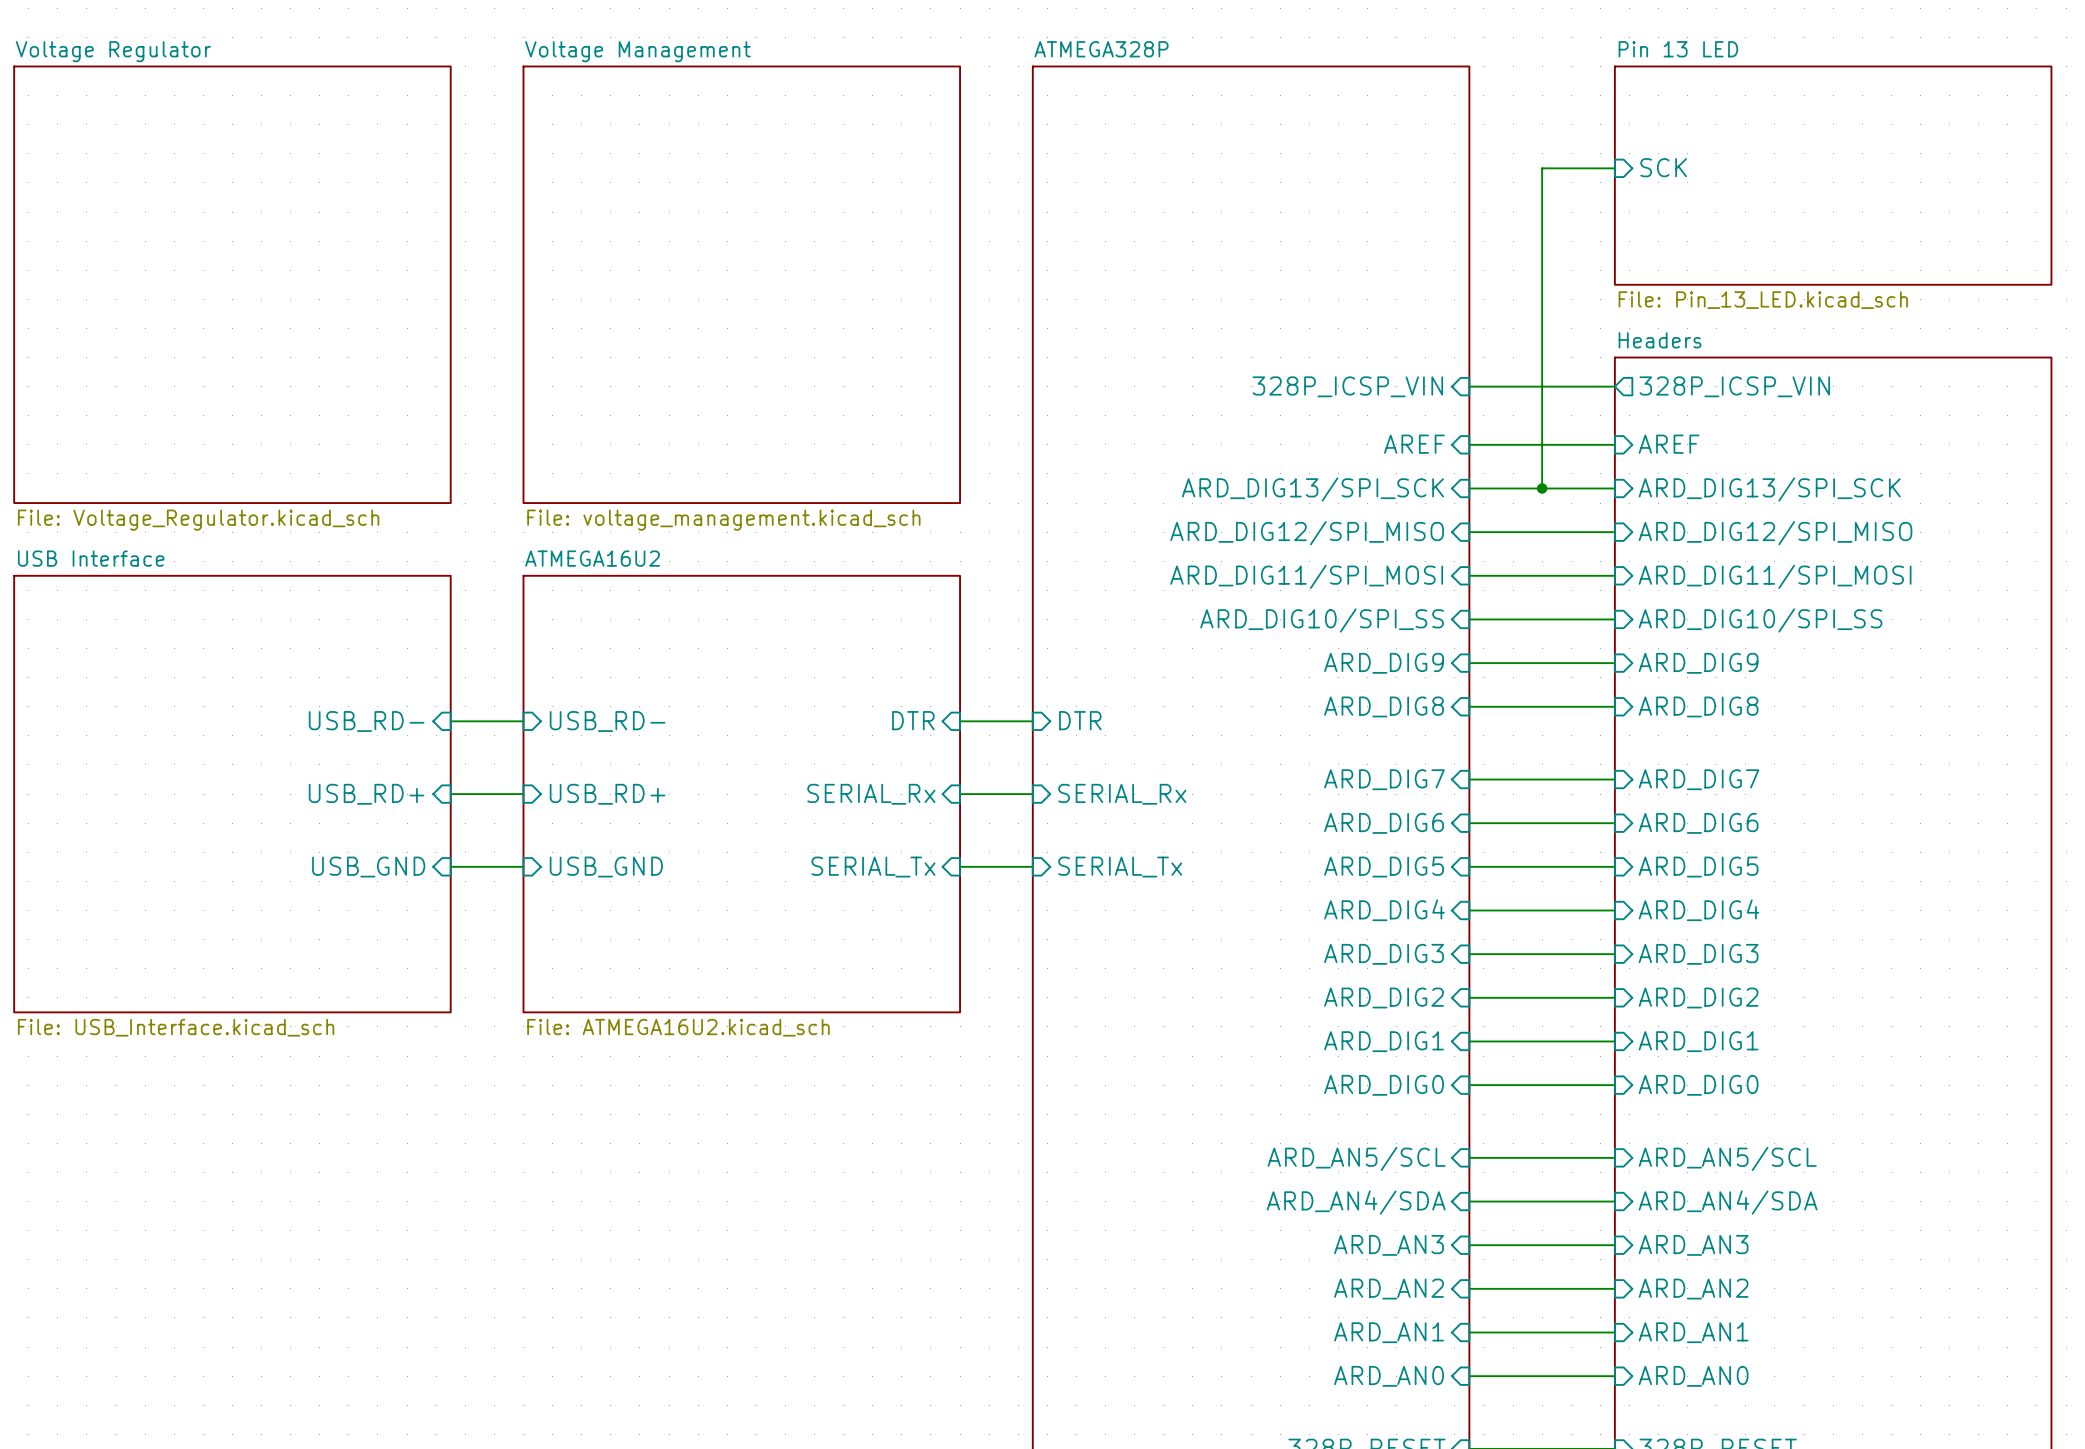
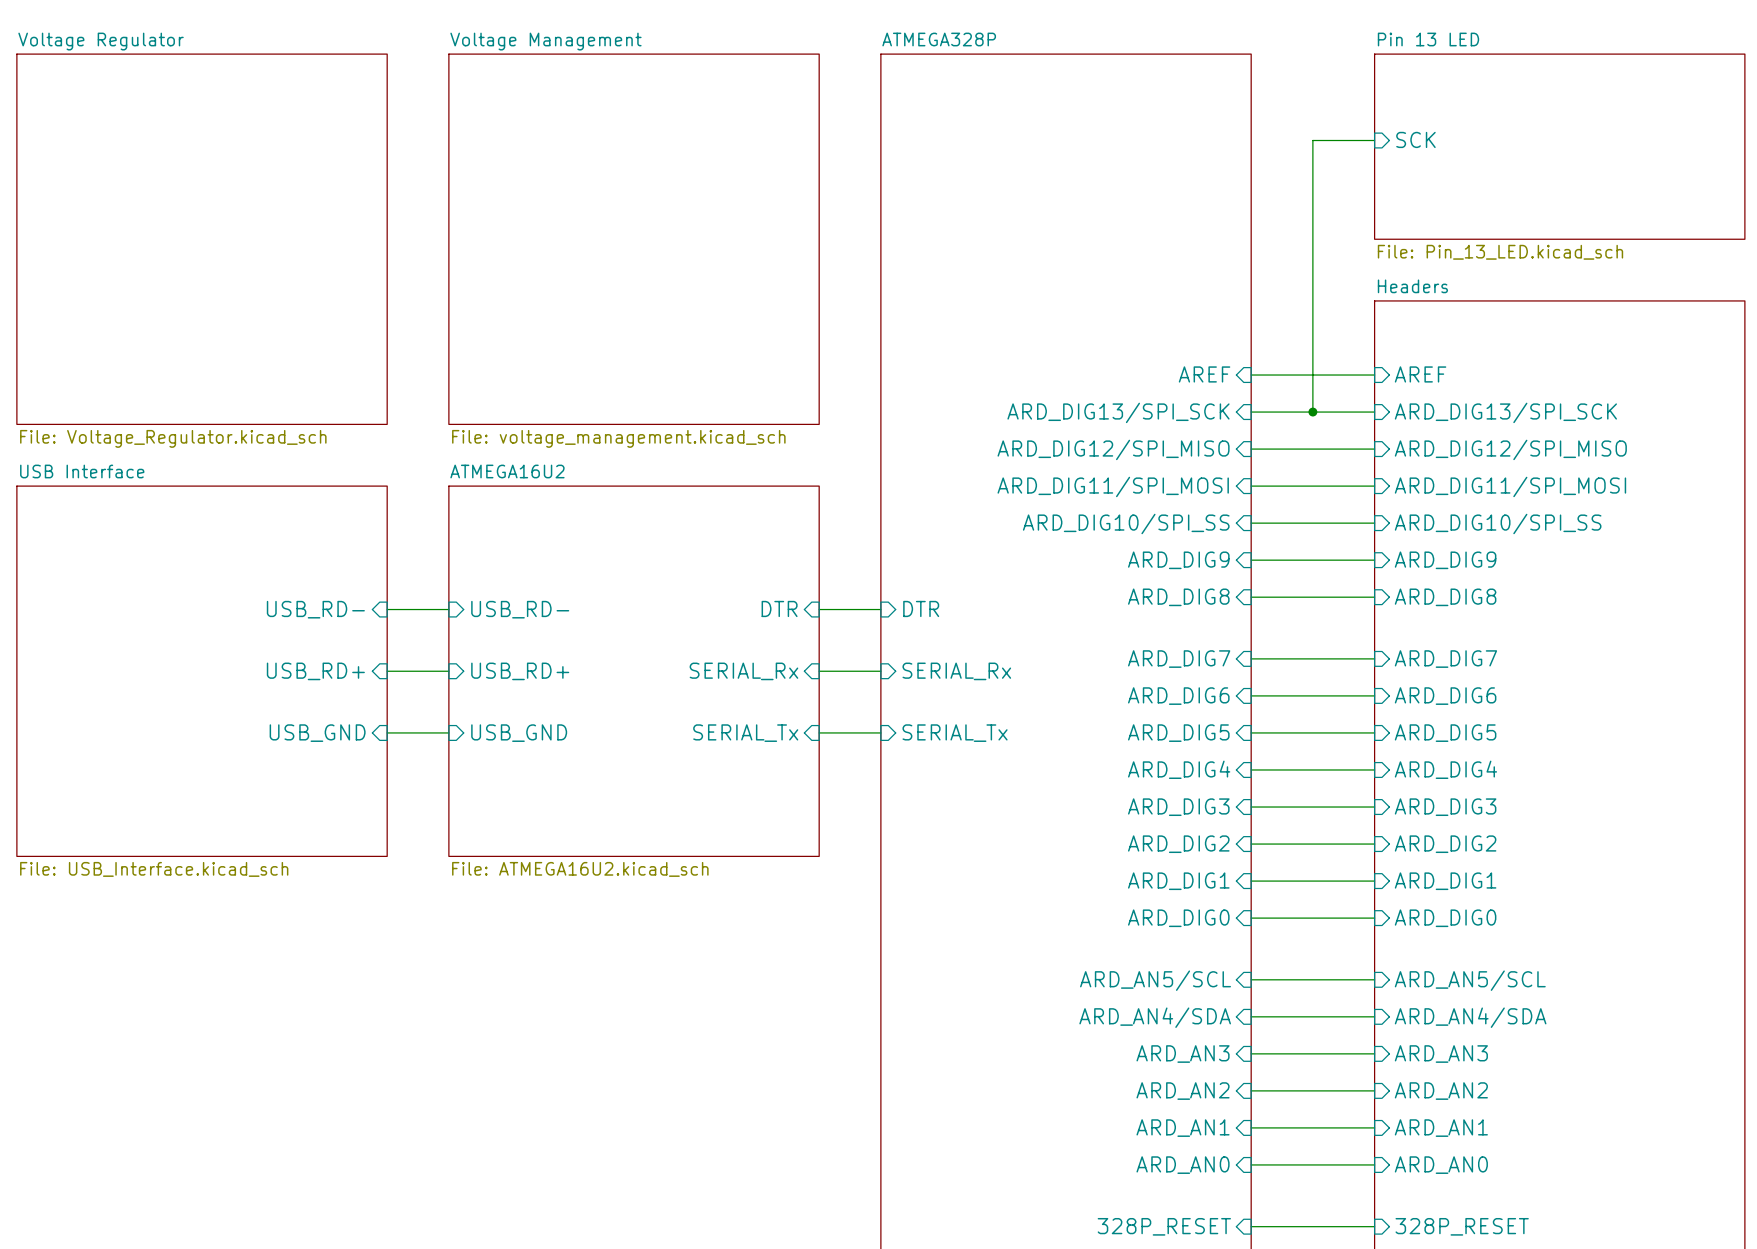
sheet pin: 328P_ICSP_VIN (1347, 386) -> none
wire: (1469, 386) (1614, 386) -> none
sheet pin: 328P_ICSP_VIN (1734, 386) -> none

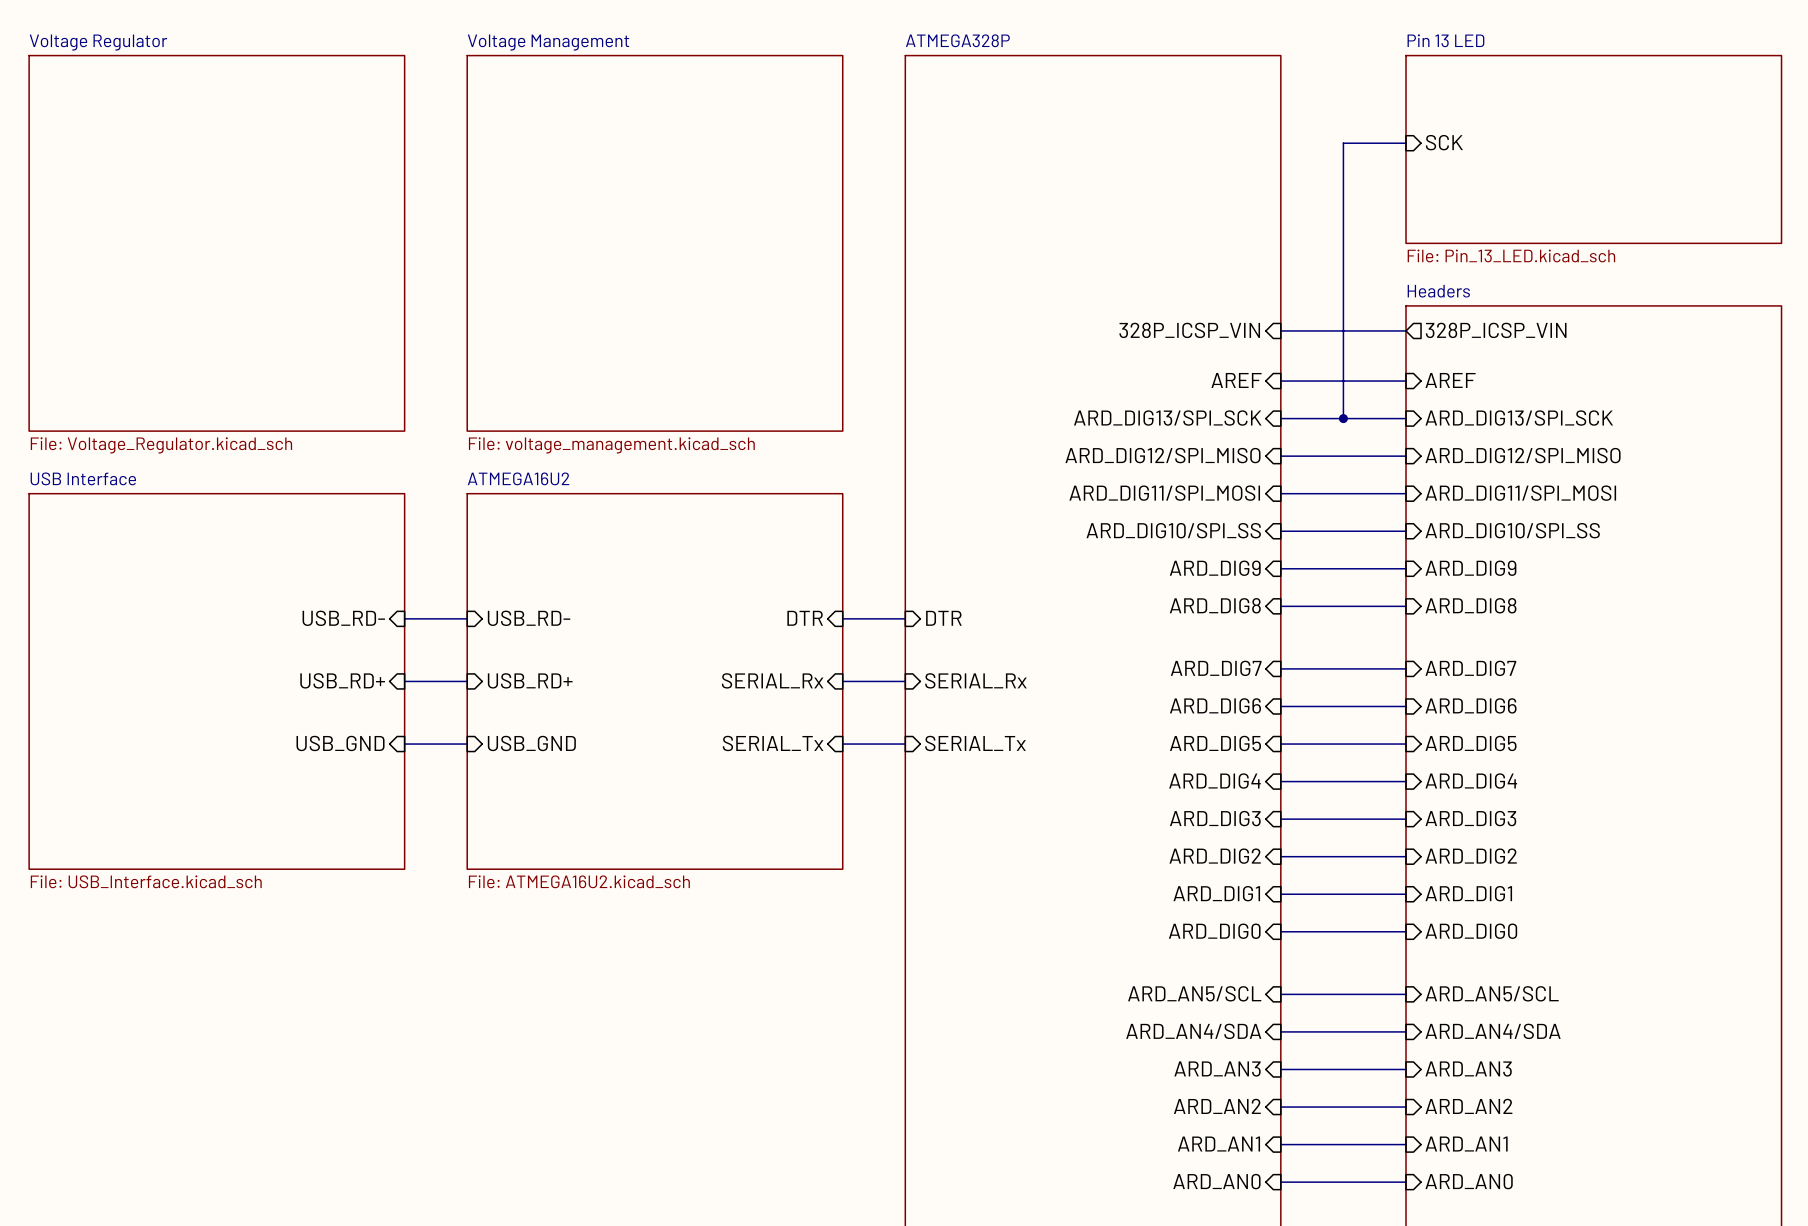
sheet pin: none -> 328P_ICSP_VIN (1189, 330)
wire: none -> (1280, 330) (1406, 330)
sheet pin: none -> 328P_ICSP_VIN (1496, 330)

